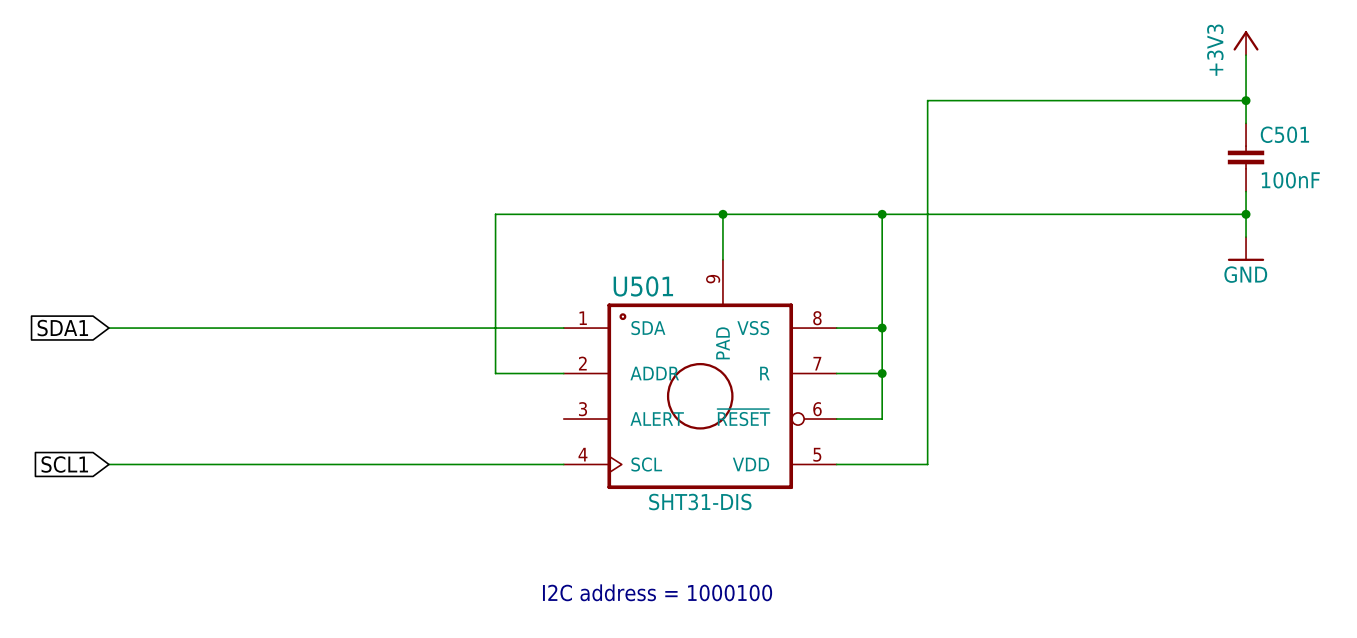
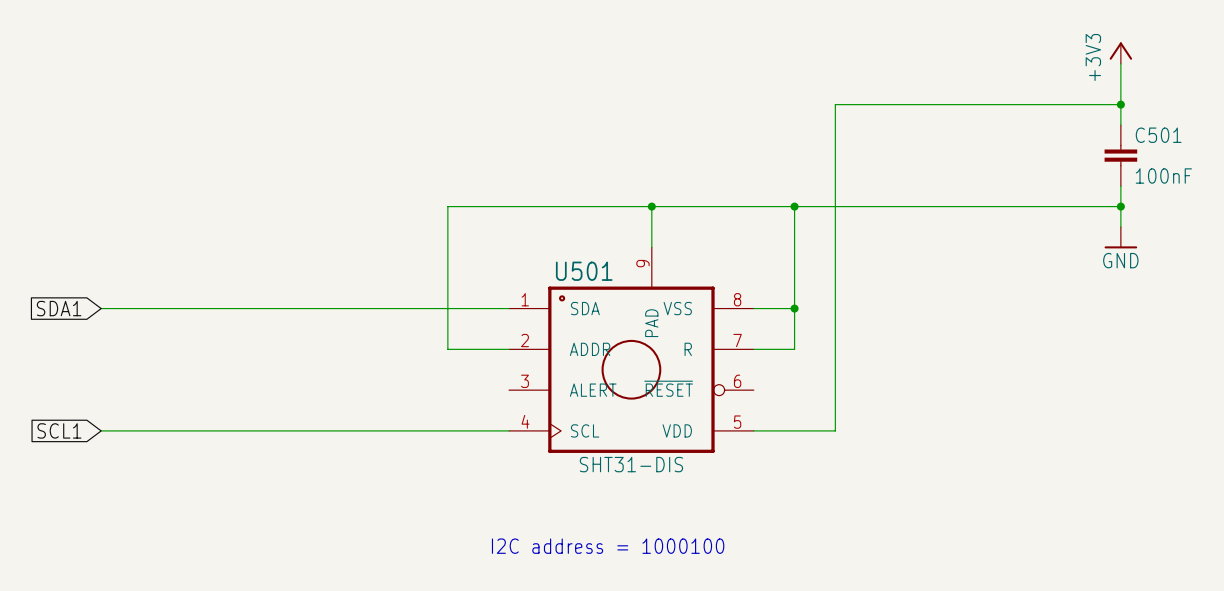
wire: (882, 373) (882, 419) (836, 419) -> none
junction: (882, 373) -> none

